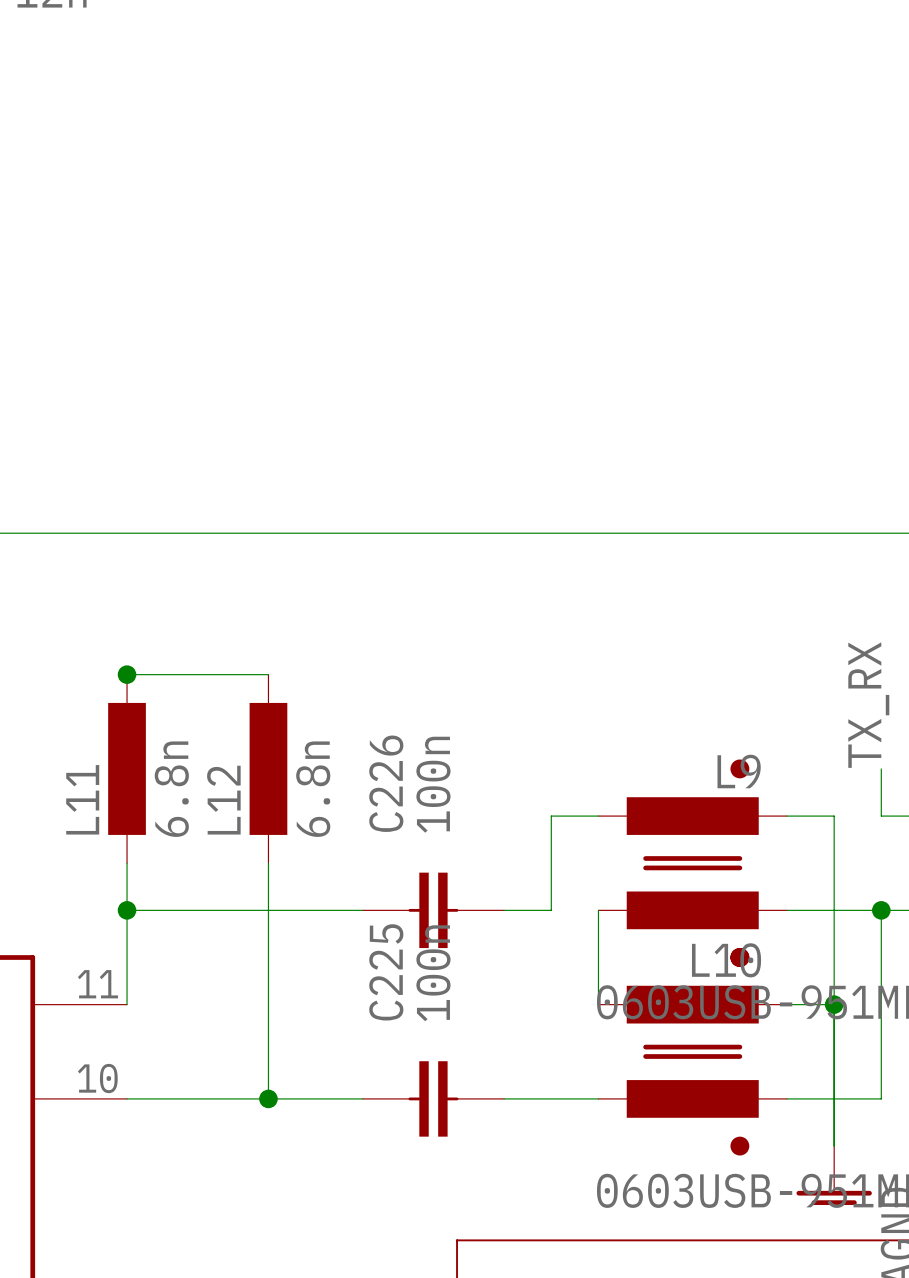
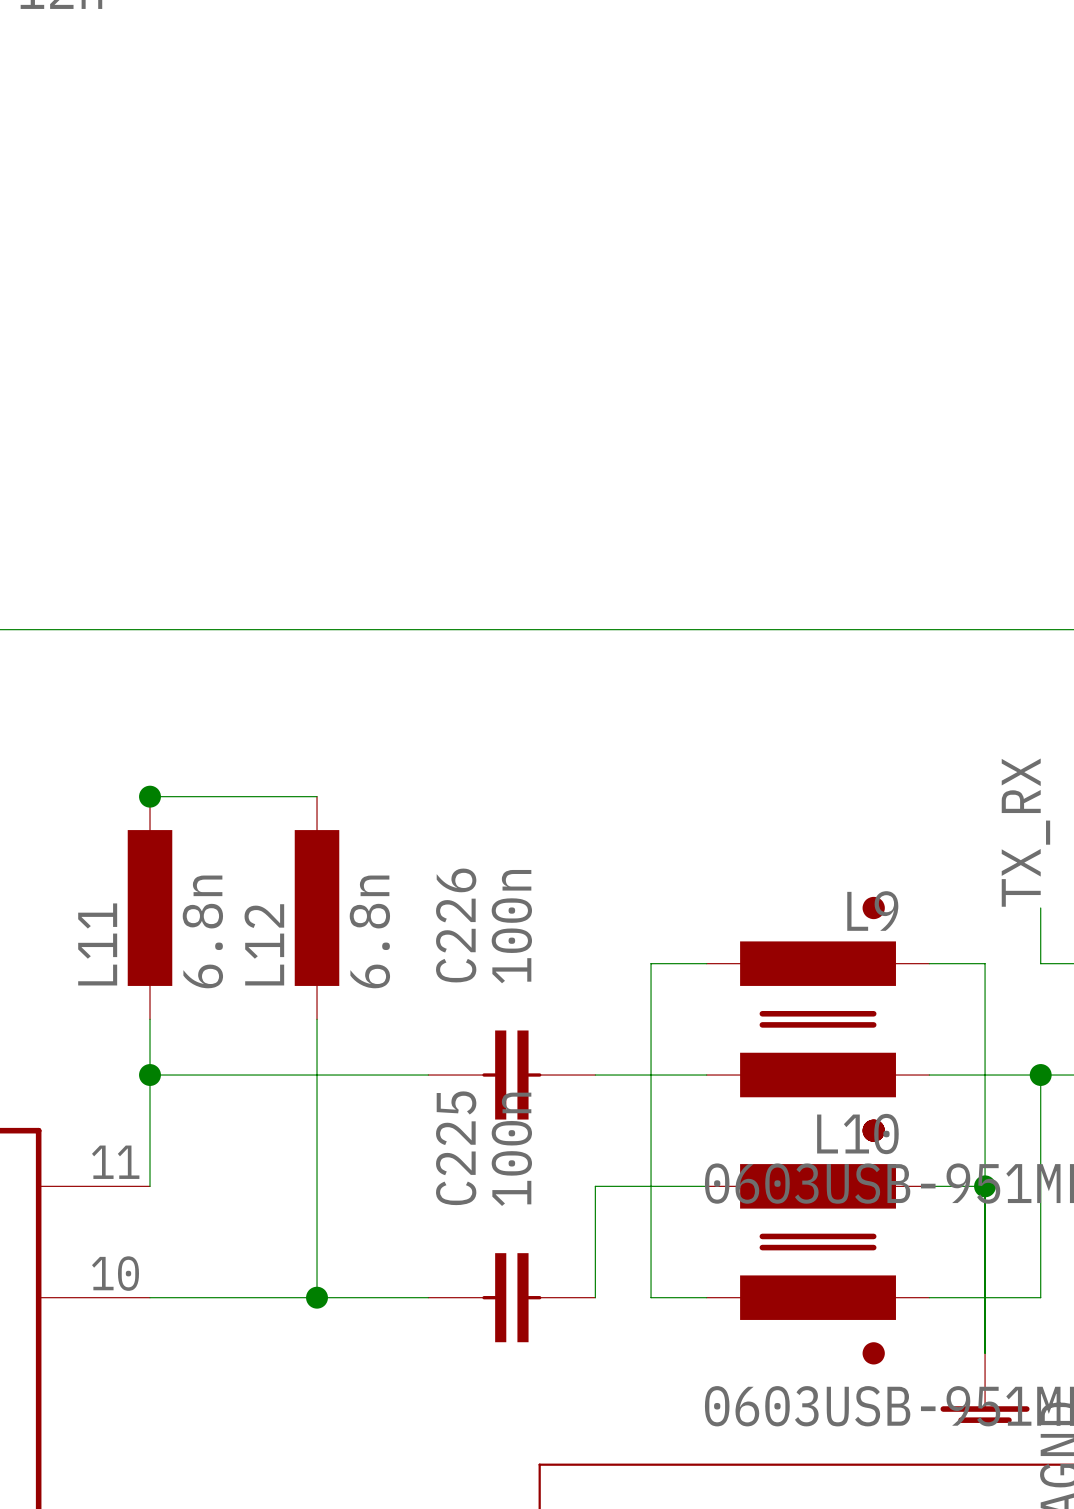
wire: (598, 910) (598, 1004) -> (706, 1075) (651, 1075) (651, 1297)
wire: (504, 1098) (551, 1098) -> (595, 1297) (595, 1186) (706, 1186)

